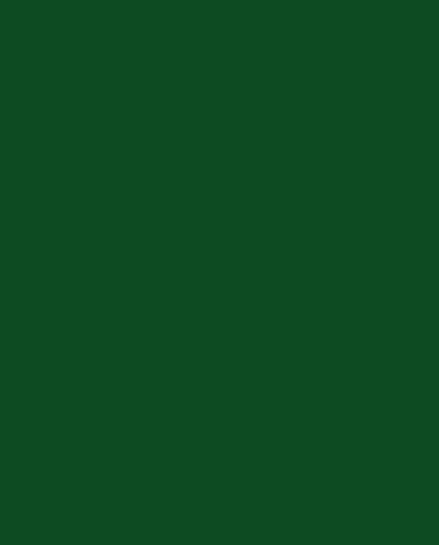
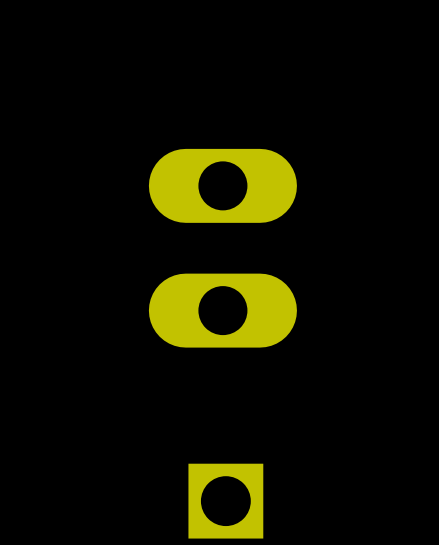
part: none -> (222, 248)
part: none -> (225, 501)

